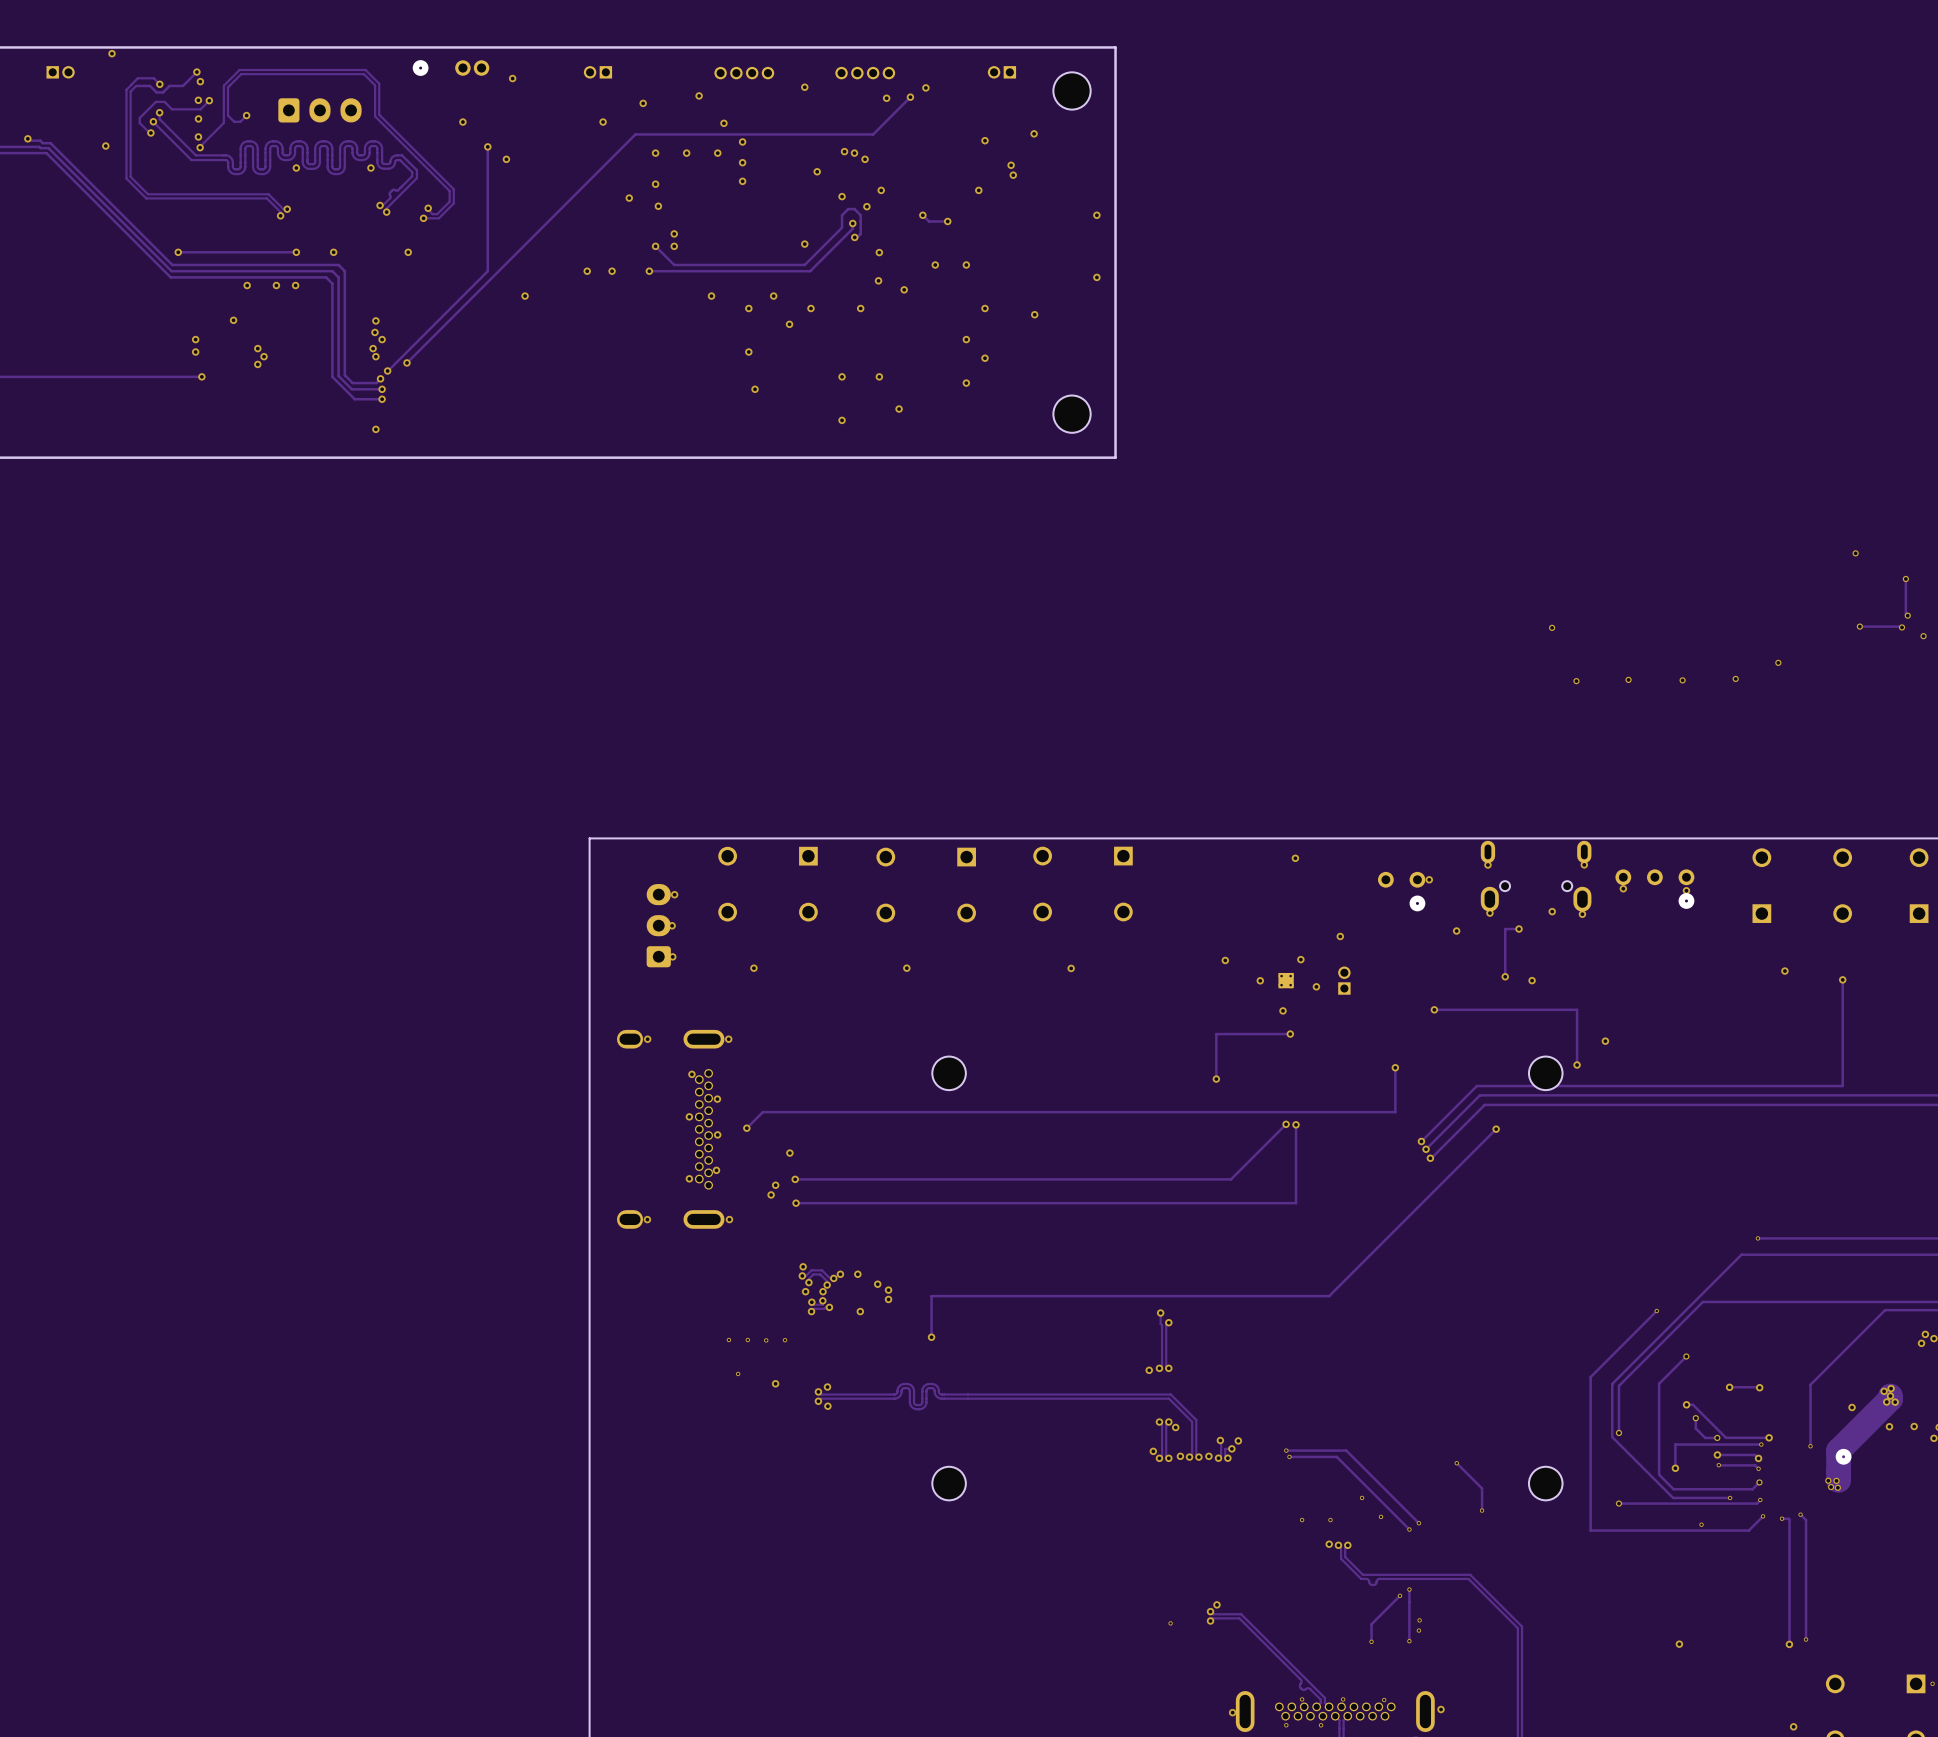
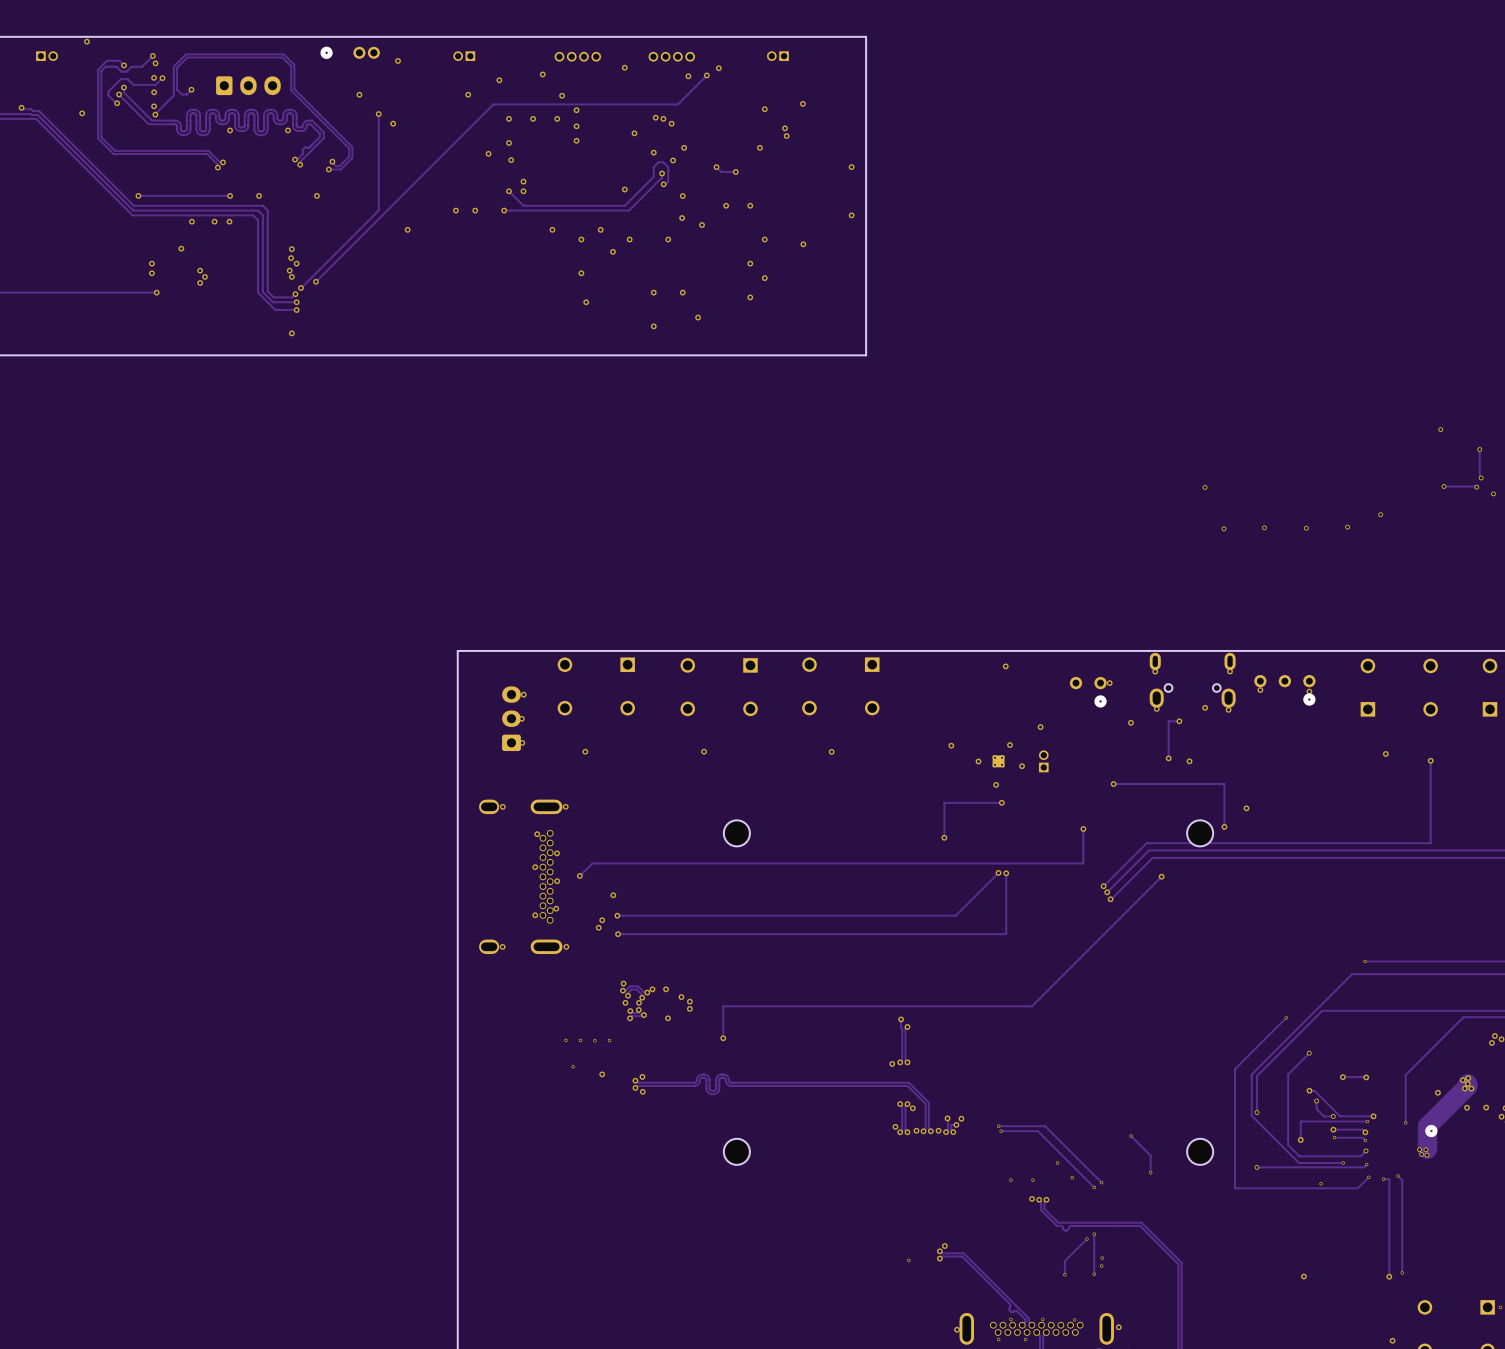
part: (1072, 90) -> none
part: (1072, 414) -> none

